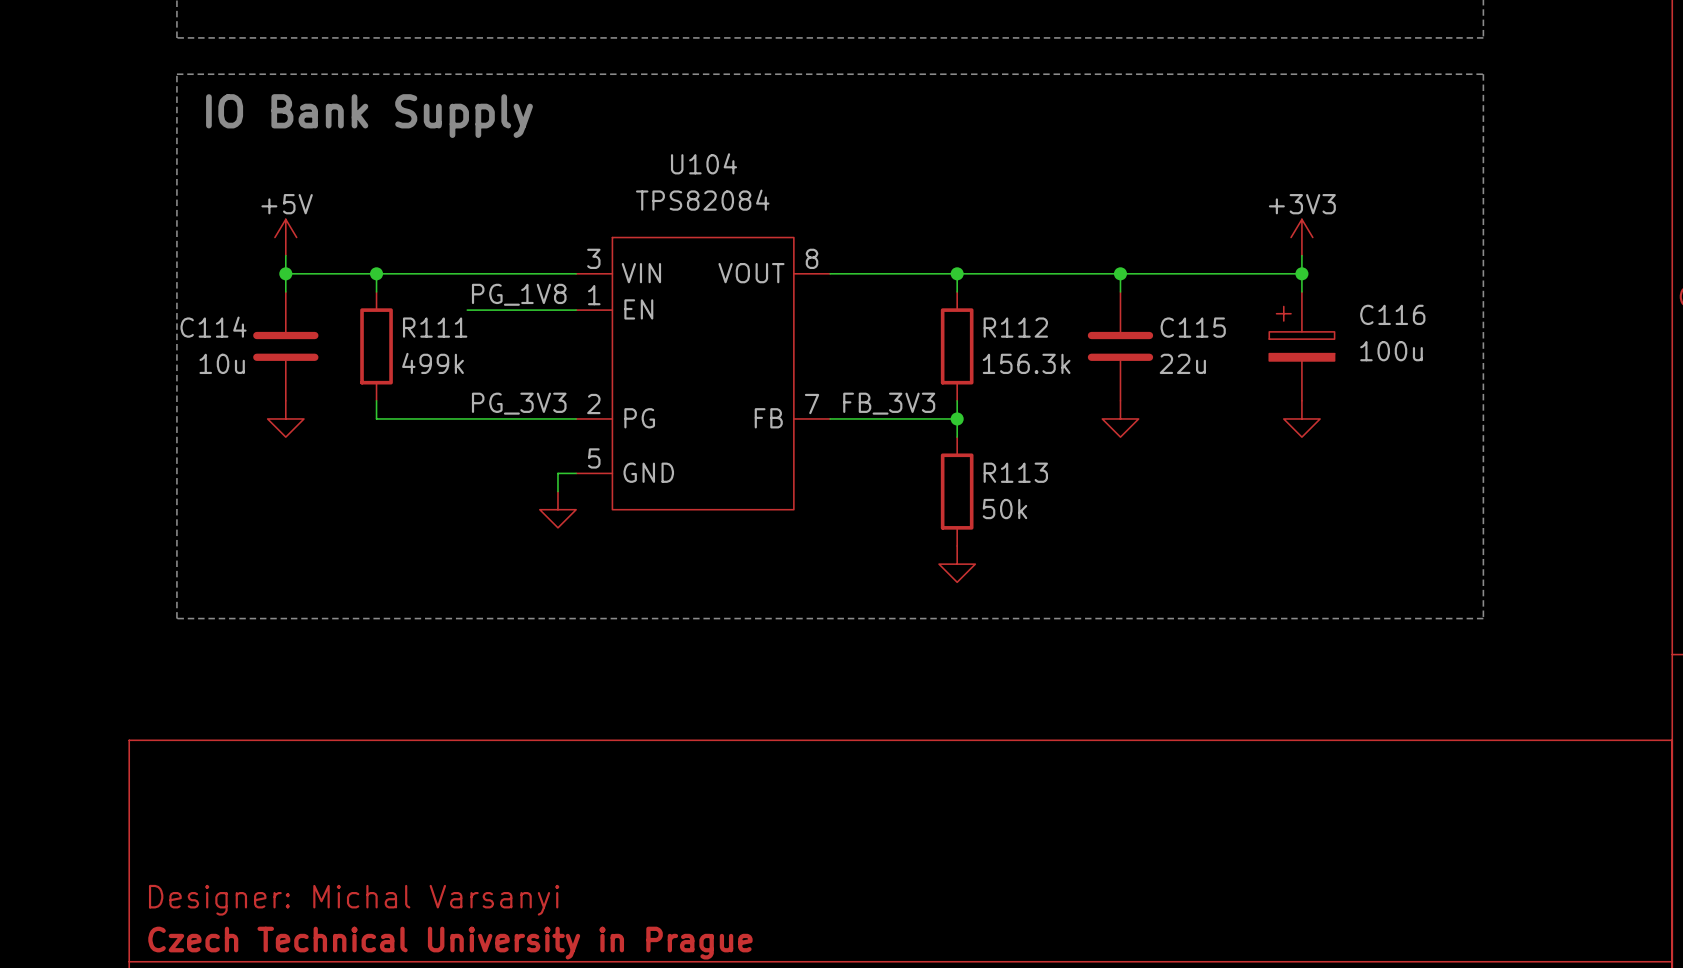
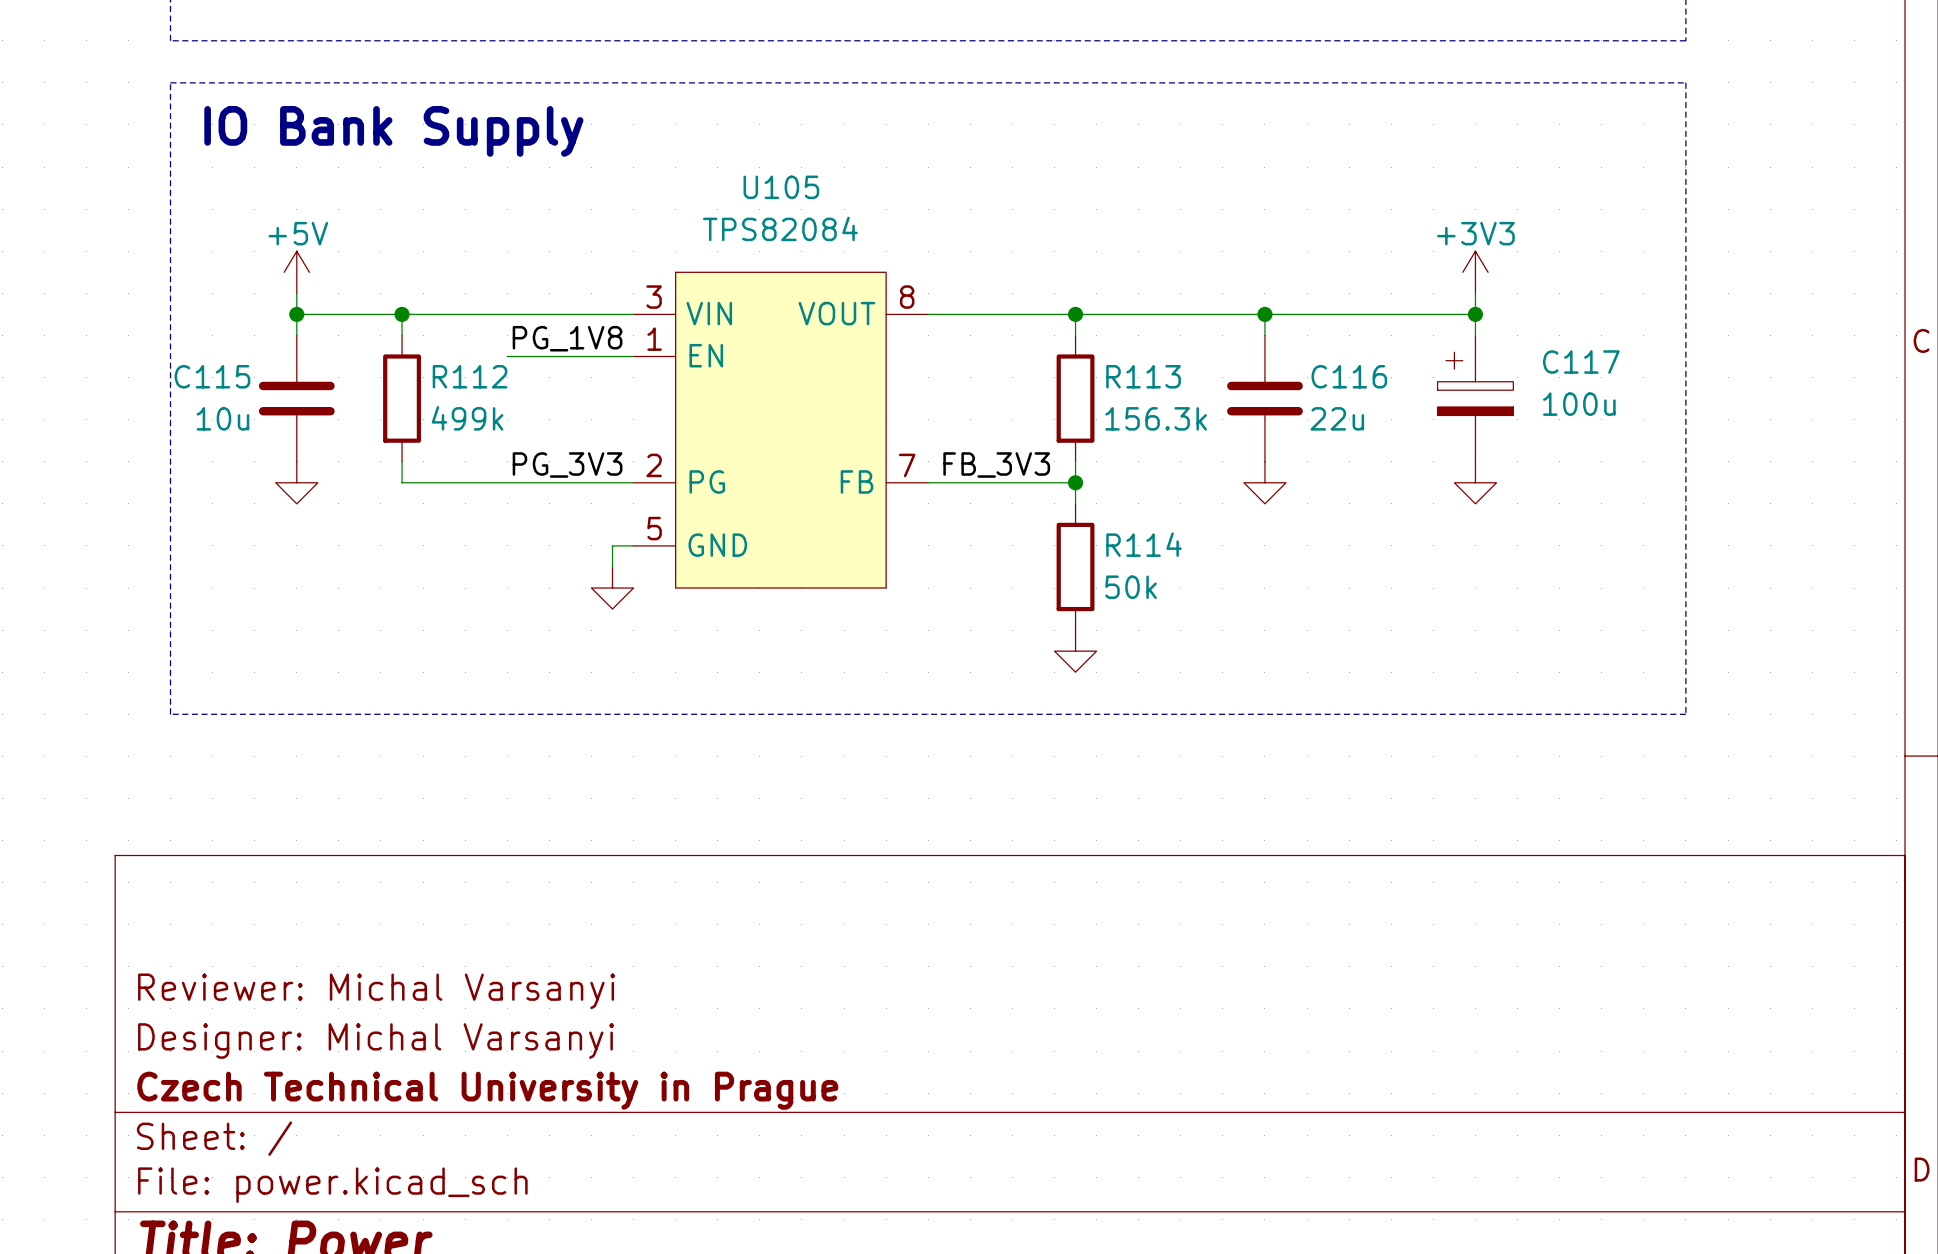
U104 name: U104 (704, 163) -> U105 (781, 187)
C116 name: C116 (1392, 314) -> C117 (1581, 362)
C114 name: C114 (213, 327) -> C115 (212, 376)
R111 name: R111 (435, 327) -> R112 (470, 376)
R112 name: R112 (1015, 327) -> R113 (1143, 376)
C115 name: C115 (1193, 327) -> C116 (1349, 376)
R113 name: R113 (1015, 472) -> R114 (1144, 544)
title block: none -> Reviewer: Michal Varsanyi (376, 991)

